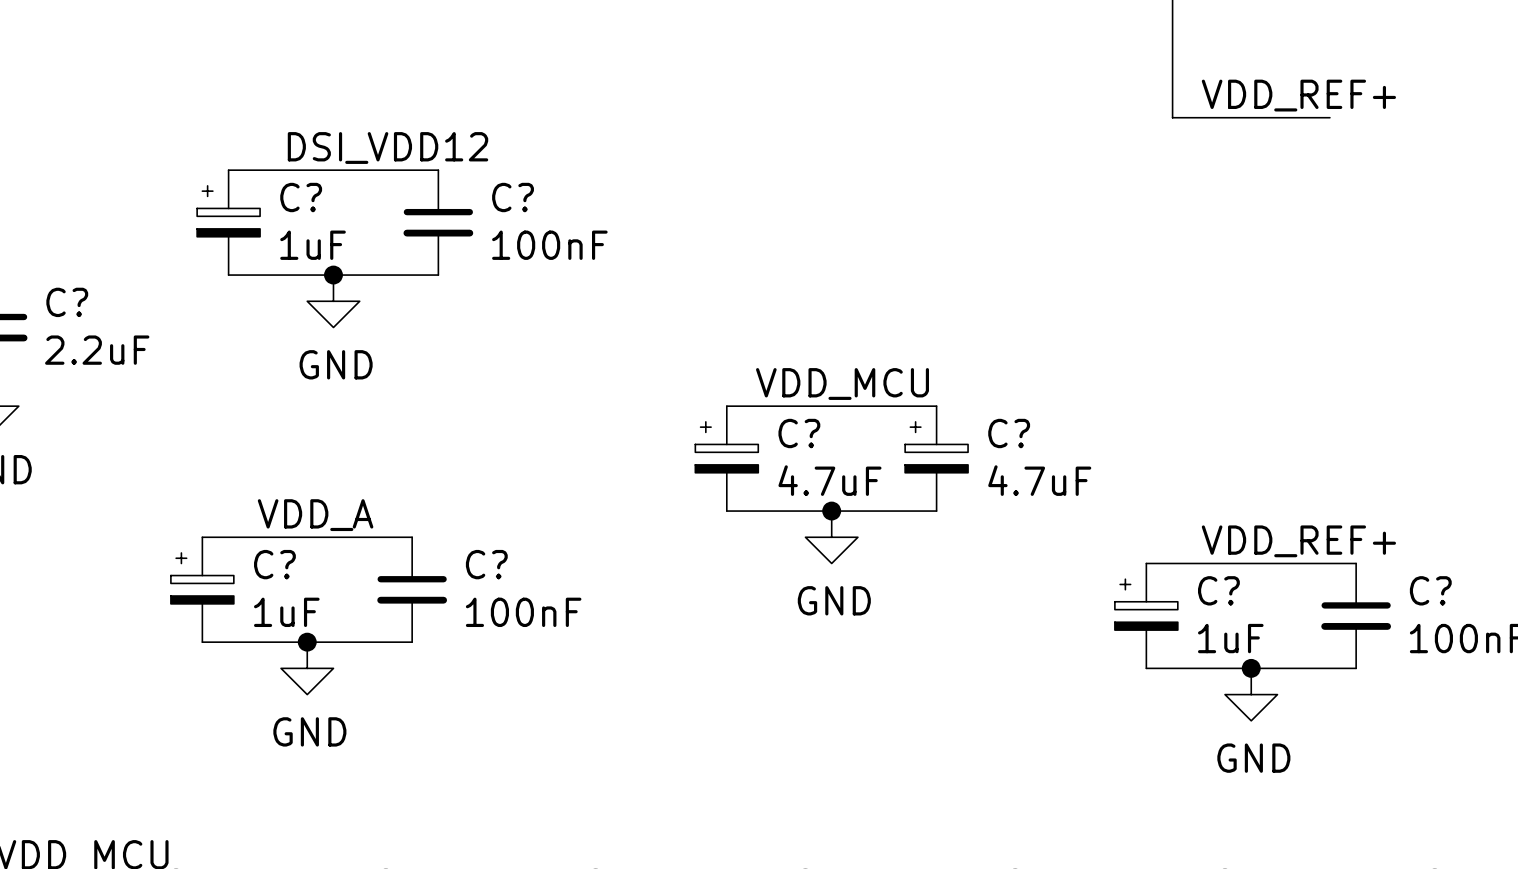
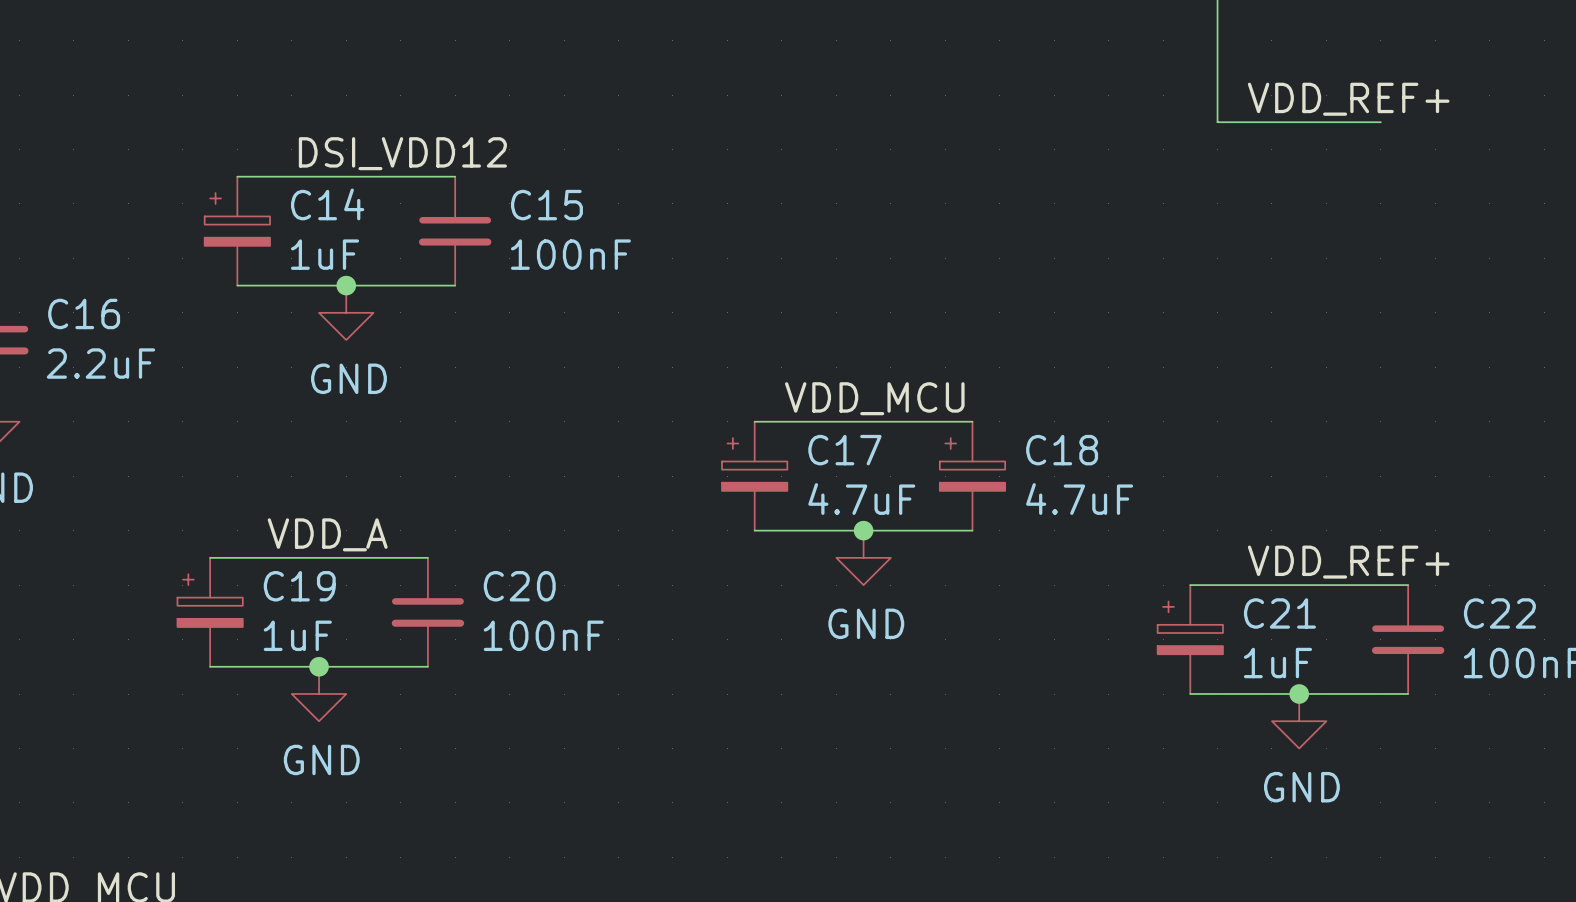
C? name: C? (301, 197) -> C14 (327, 204)
C? name: C? (513, 197) -> C15 (546, 205)
C? name: C? (67, 302) -> C16 (84, 313)
C? name: C? (799, 433) -> C17 (844, 450)
C? name: C? (1009, 433) -> C18 (1062, 450)
C? name: C? (274, 564) -> C19 (299, 586)
C? name: C? (486, 564) -> C20 (519, 586)
C? name: C? (1218, 590) -> C21 (1279, 613)
C? name: C? (1430, 590) -> C22 (1499, 613)

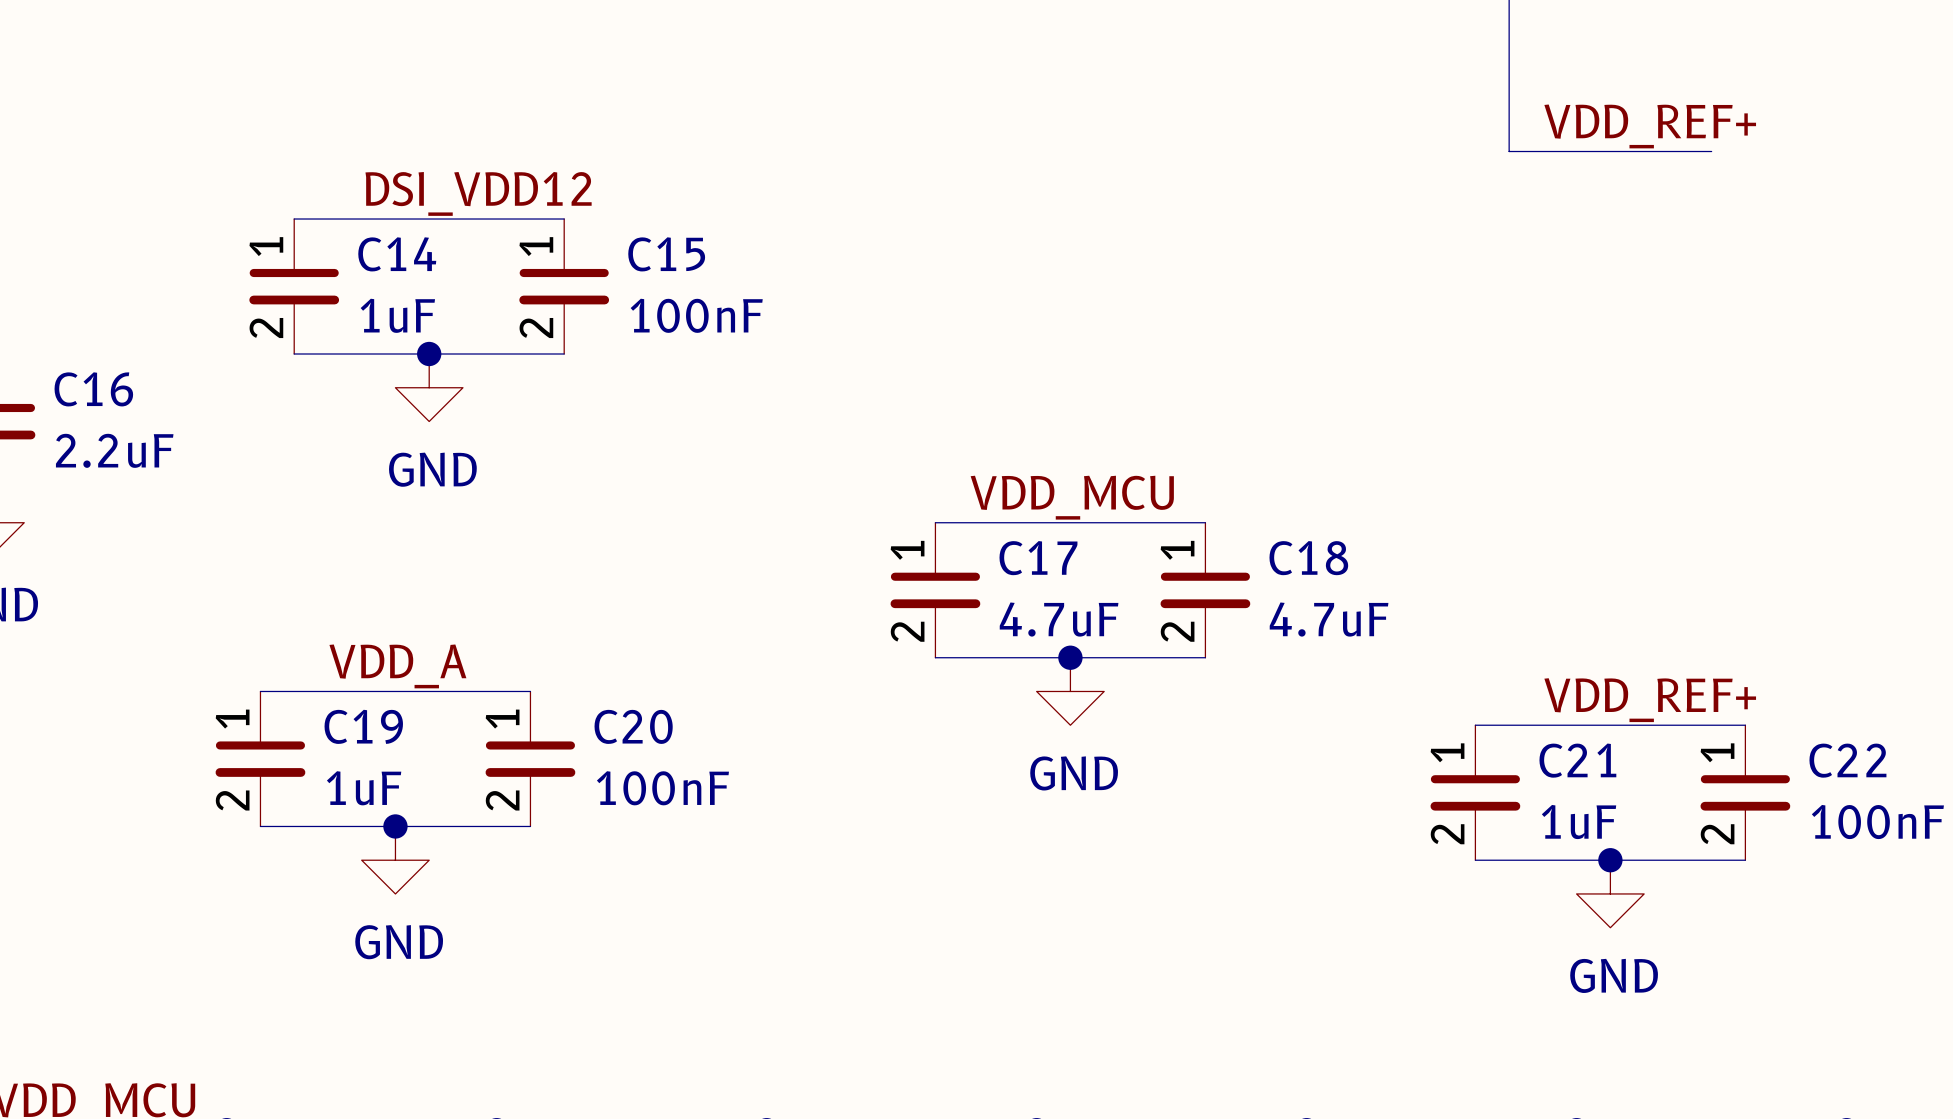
C14 symbol: [204, 176, 271, 286] -> [249, 219, 340, 355]
C15 pin number: none -> 1 (536, 246)
C15 pin number: none -> 2 (536, 328)
C17 symbol: [722, 421, 788, 531] -> [890, 522, 981, 658]
C18 symbol: [939, 421, 1006, 531] -> [1160, 522, 1251, 658]
C19 symbol: [177, 557, 243, 667] -> [215, 691, 306, 827]
C20 pin number: none -> 1 (502, 719)
C21 symbol: [1157, 585, 1223, 695] -> [1430, 725, 1521, 861]
C22 pin number: none -> 1 (1717, 752)
C20 pin number: none -> 2 (502, 800)
C22 pin number: none -> 2 (1717, 834)

